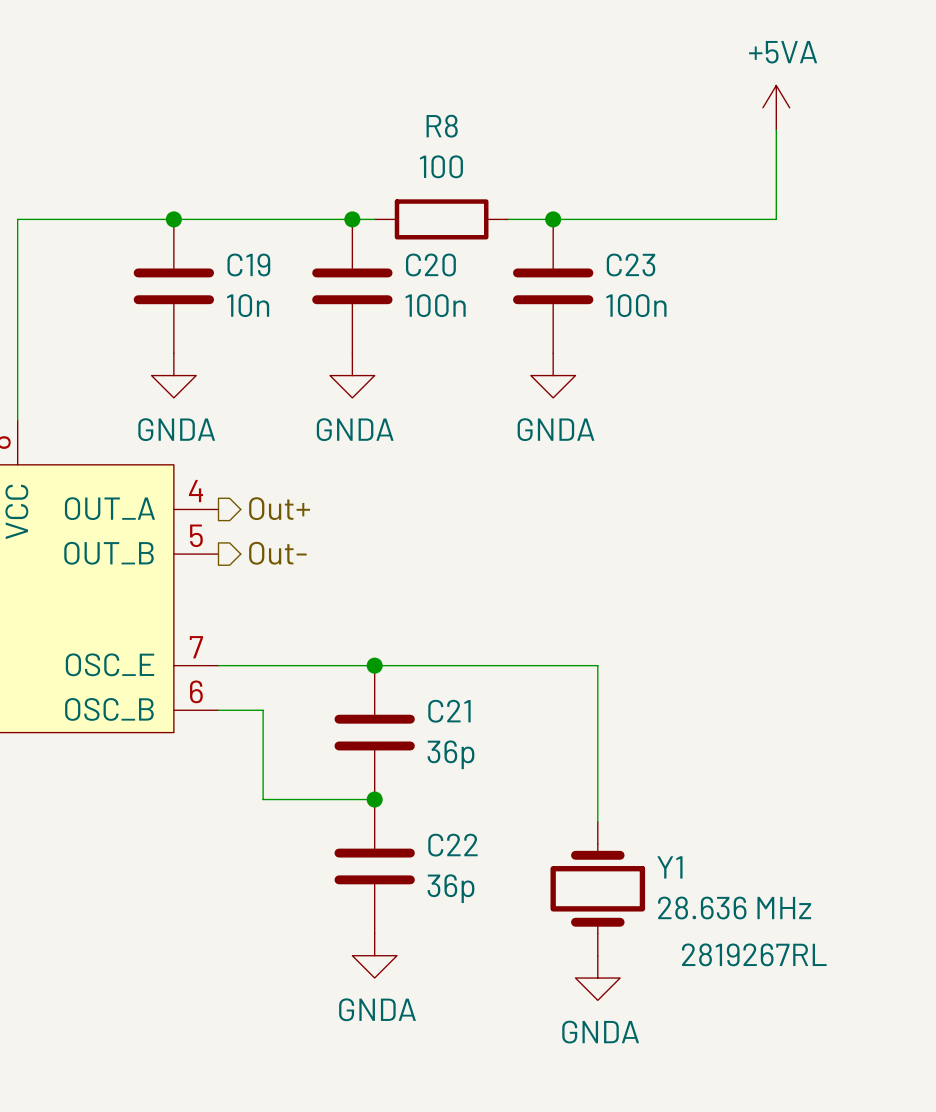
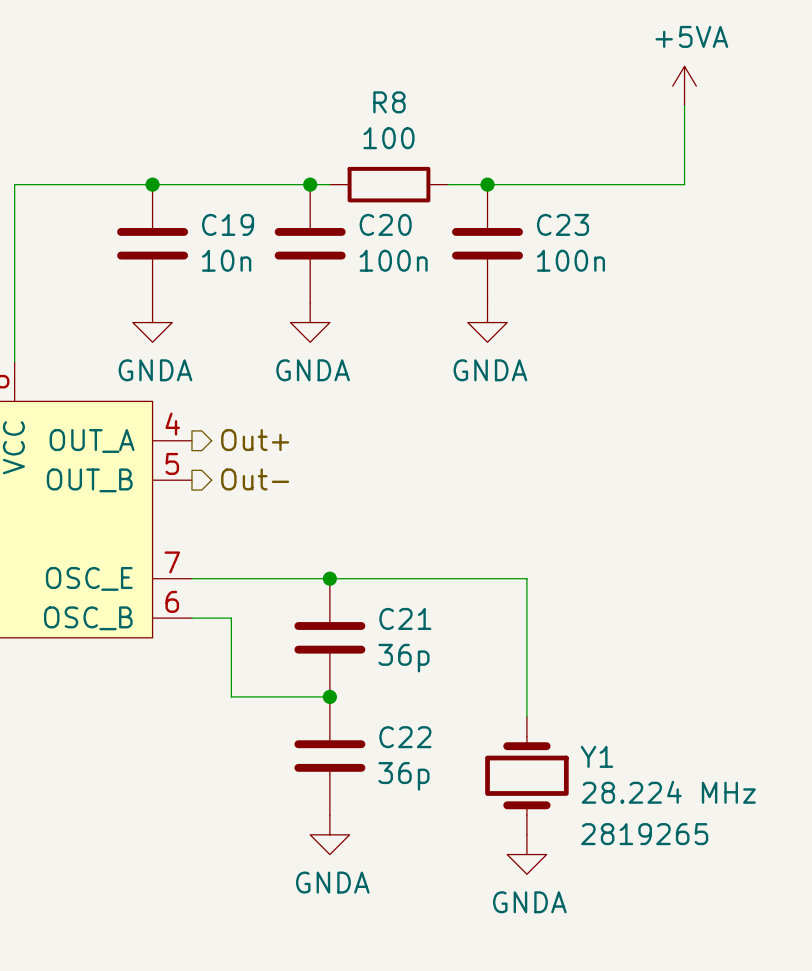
Y1 value: 28.636 MHz (734, 907) -> 28.224 MHz (668, 792)
Y1 text: 2819267RL (754, 954) -> 2819265 (644, 834)

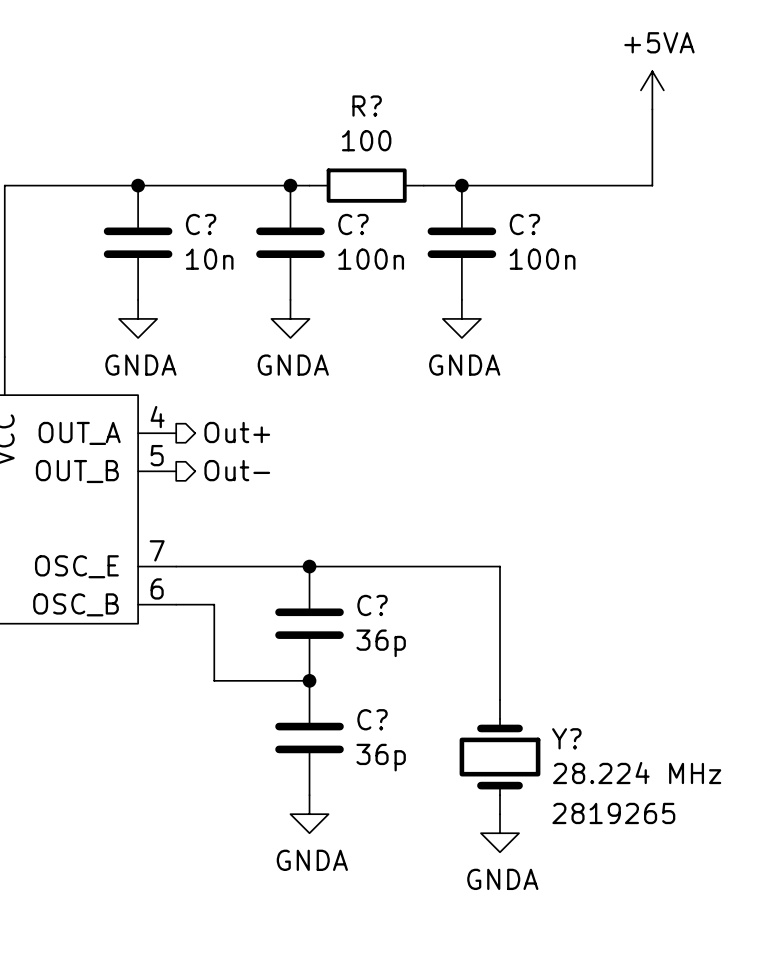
R8 name: R8 (389, 102) -> R? (367, 106)
C19 name: C19 (228, 224) -> C? (201, 224)
C20 name: C20 (385, 224) -> C? (353, 224)
C23 name: C23 (563, 224) -> C? (524, 224)
C21 name: C21 (405, 618) -> C? (372, 605)
C22 name: C22 (405, 737) -> C? (372, 719)
Y1 name: Y1 (596, 756) -> Y? (566, 738)

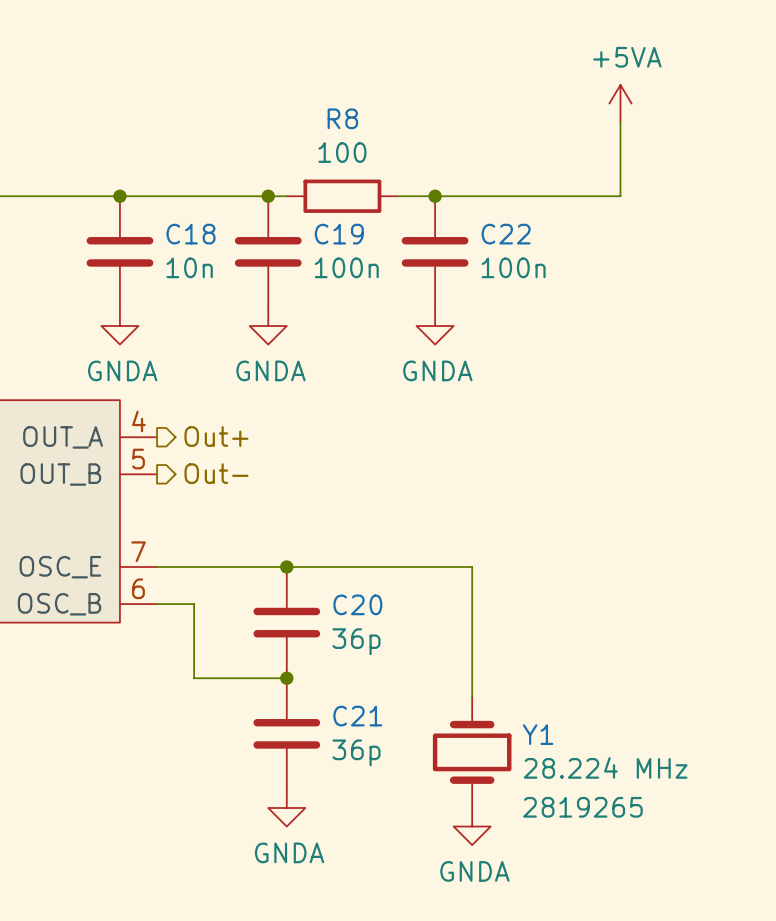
R? name: R? (367, 106) -> R8 (342, 118)
C? name: C? (201, 224) -> C18 (190, 234)
C? name: C? (353, 224) -> C19 (339, 234)
C? name: C? (524, 224) -> C22 (506, 234)
C? name: C? (372, 605) -> C20 (357, 604)
C? name: C? (372, 719) -> C21 (357, 716)
Y? name: Y? (566, 738) -> Y1 (538, 734)

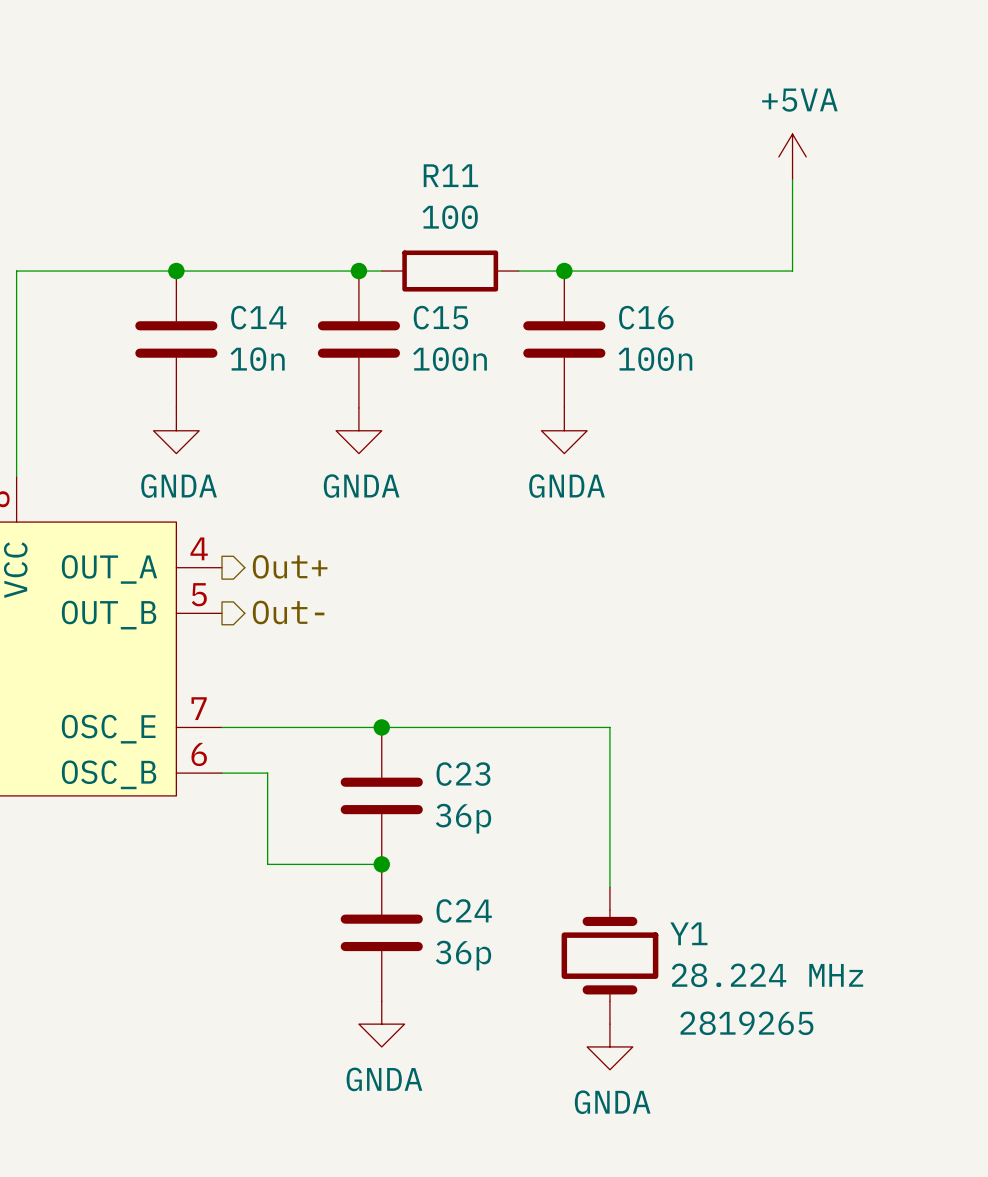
R8 name: R8 (342, 118) -> R11 (450, 175)
C18 name: C18 (190, 234) -> C14 (258, 317)
C19 name: C19 (339, 234) -> C15 (440, 317)
C22 name: C22 (506, 234) -> C16 (646, 317)
C20 name: C20 (357, 604) -> C23 (463, 774)
C21 name: C21 (357, 716) -> C24 (464, 910)

